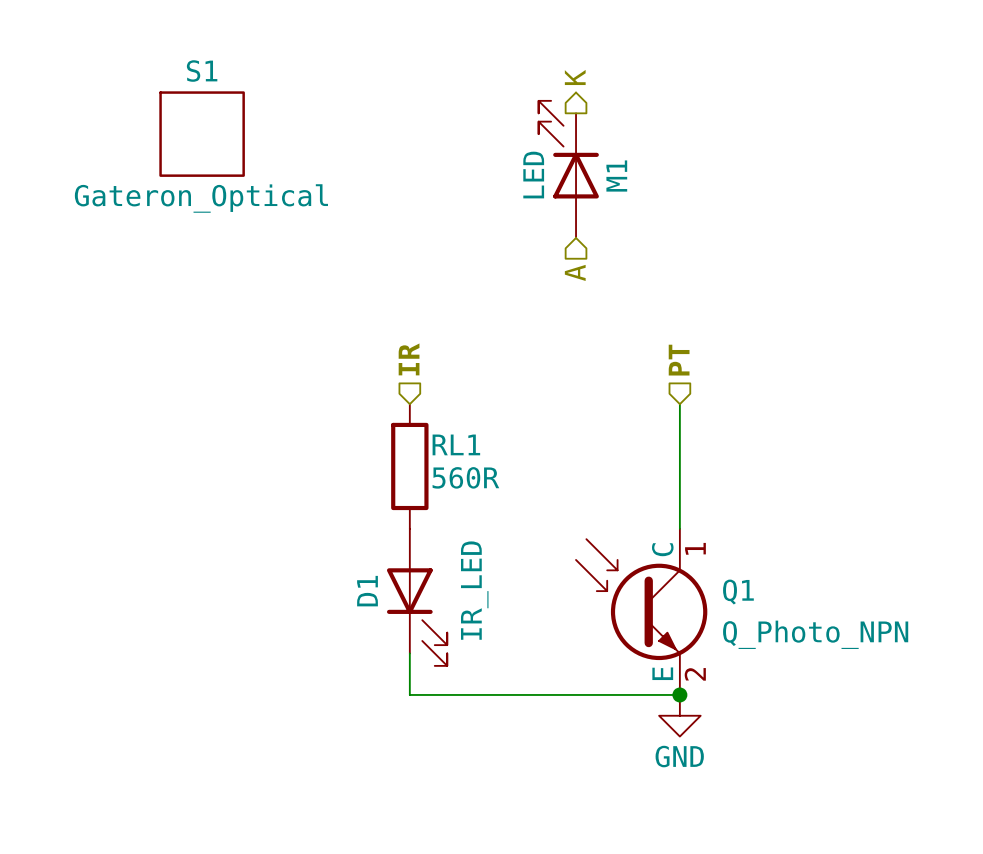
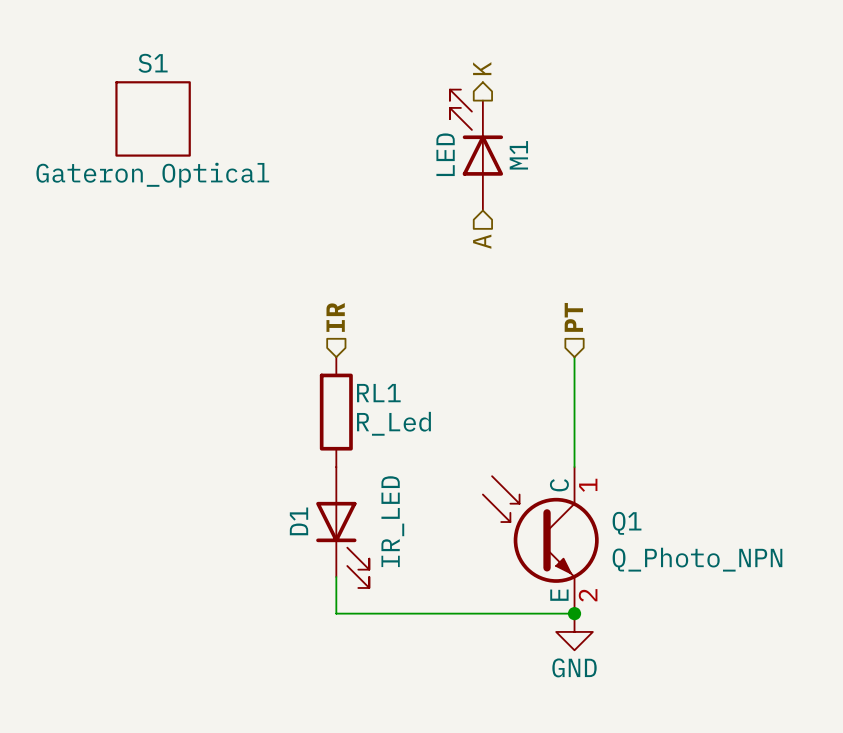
RL1 value: 560R (465, 477) -> R_Led (393, 423)

